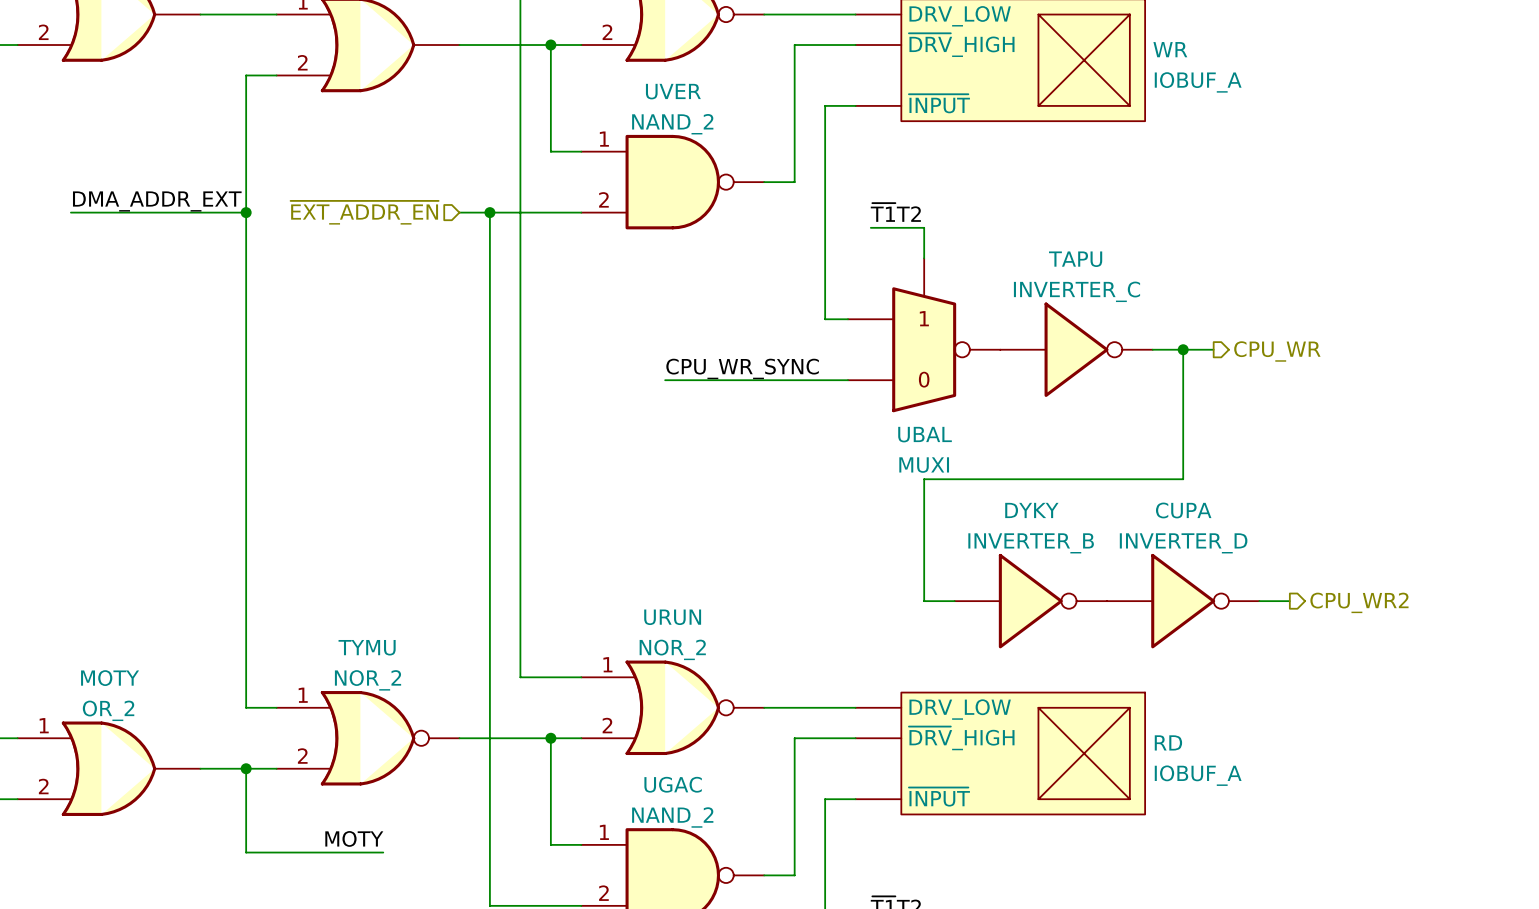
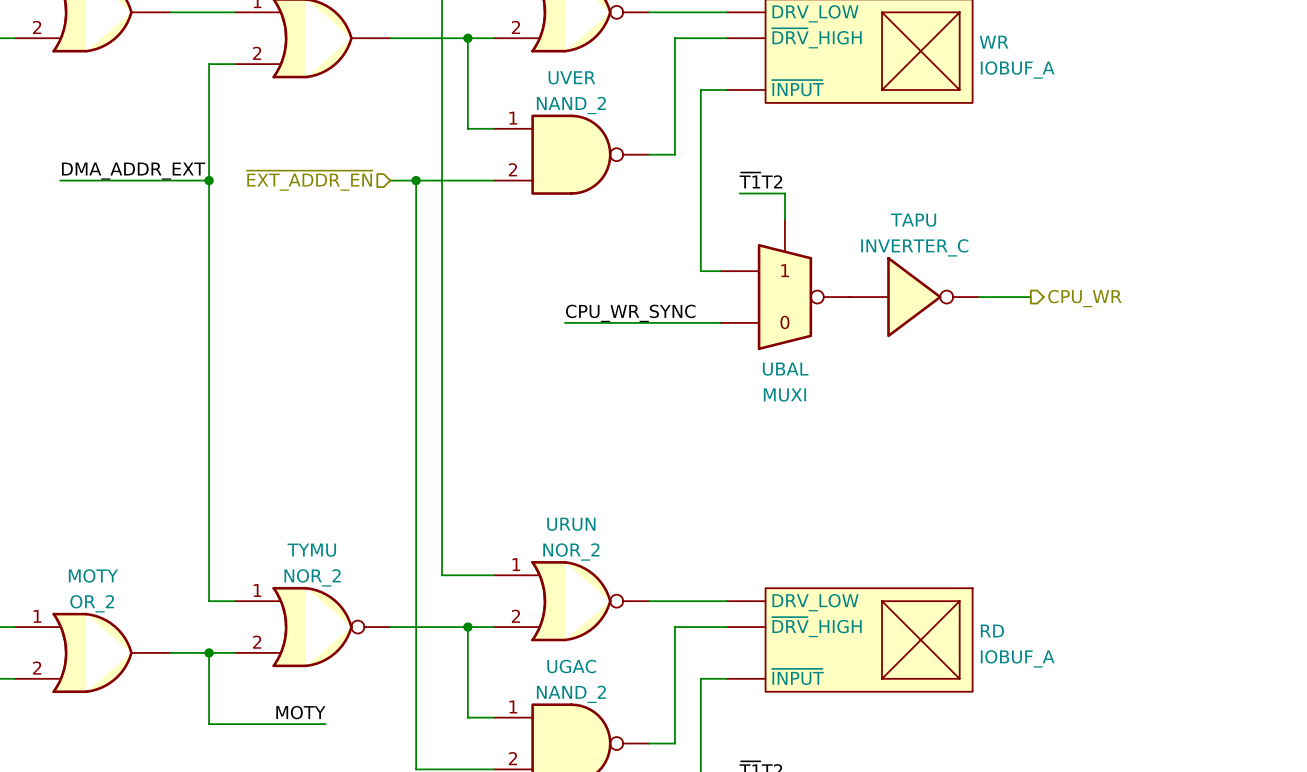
wire: (1183, 349) (1183, 479) (924, 479) (924, 601) (954, 601) -> none
junction: (1183, 349) -> none
DYKY: INVERTER_B (1030, 601) -> none
CUPA: INVERTER_D (1183, 601) -> none
wire: (1259, 601) (1289, 601) -> none
hierarchical label: CPU_WR2 (1359, 602) -> none

